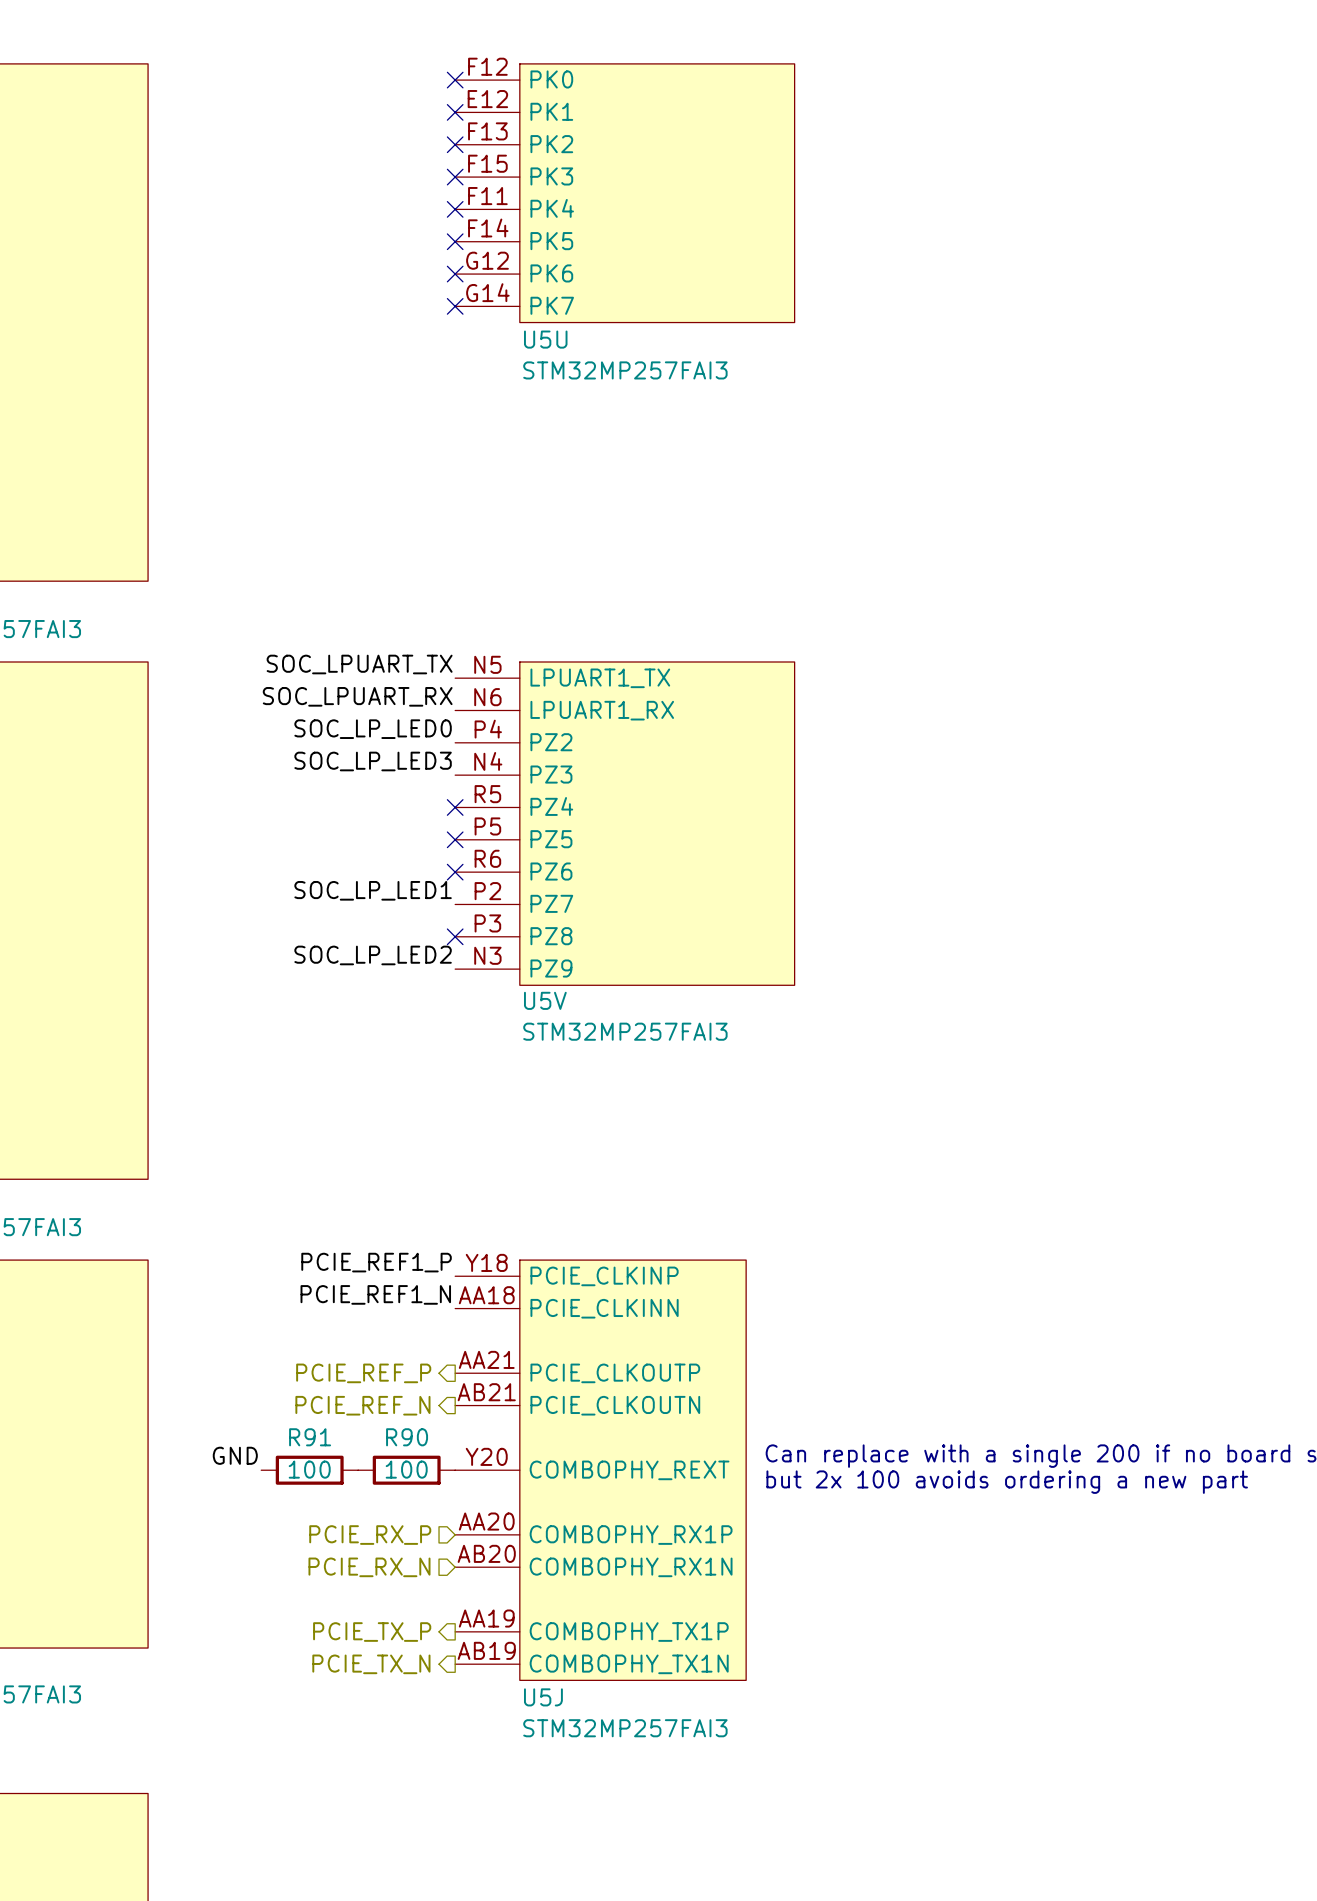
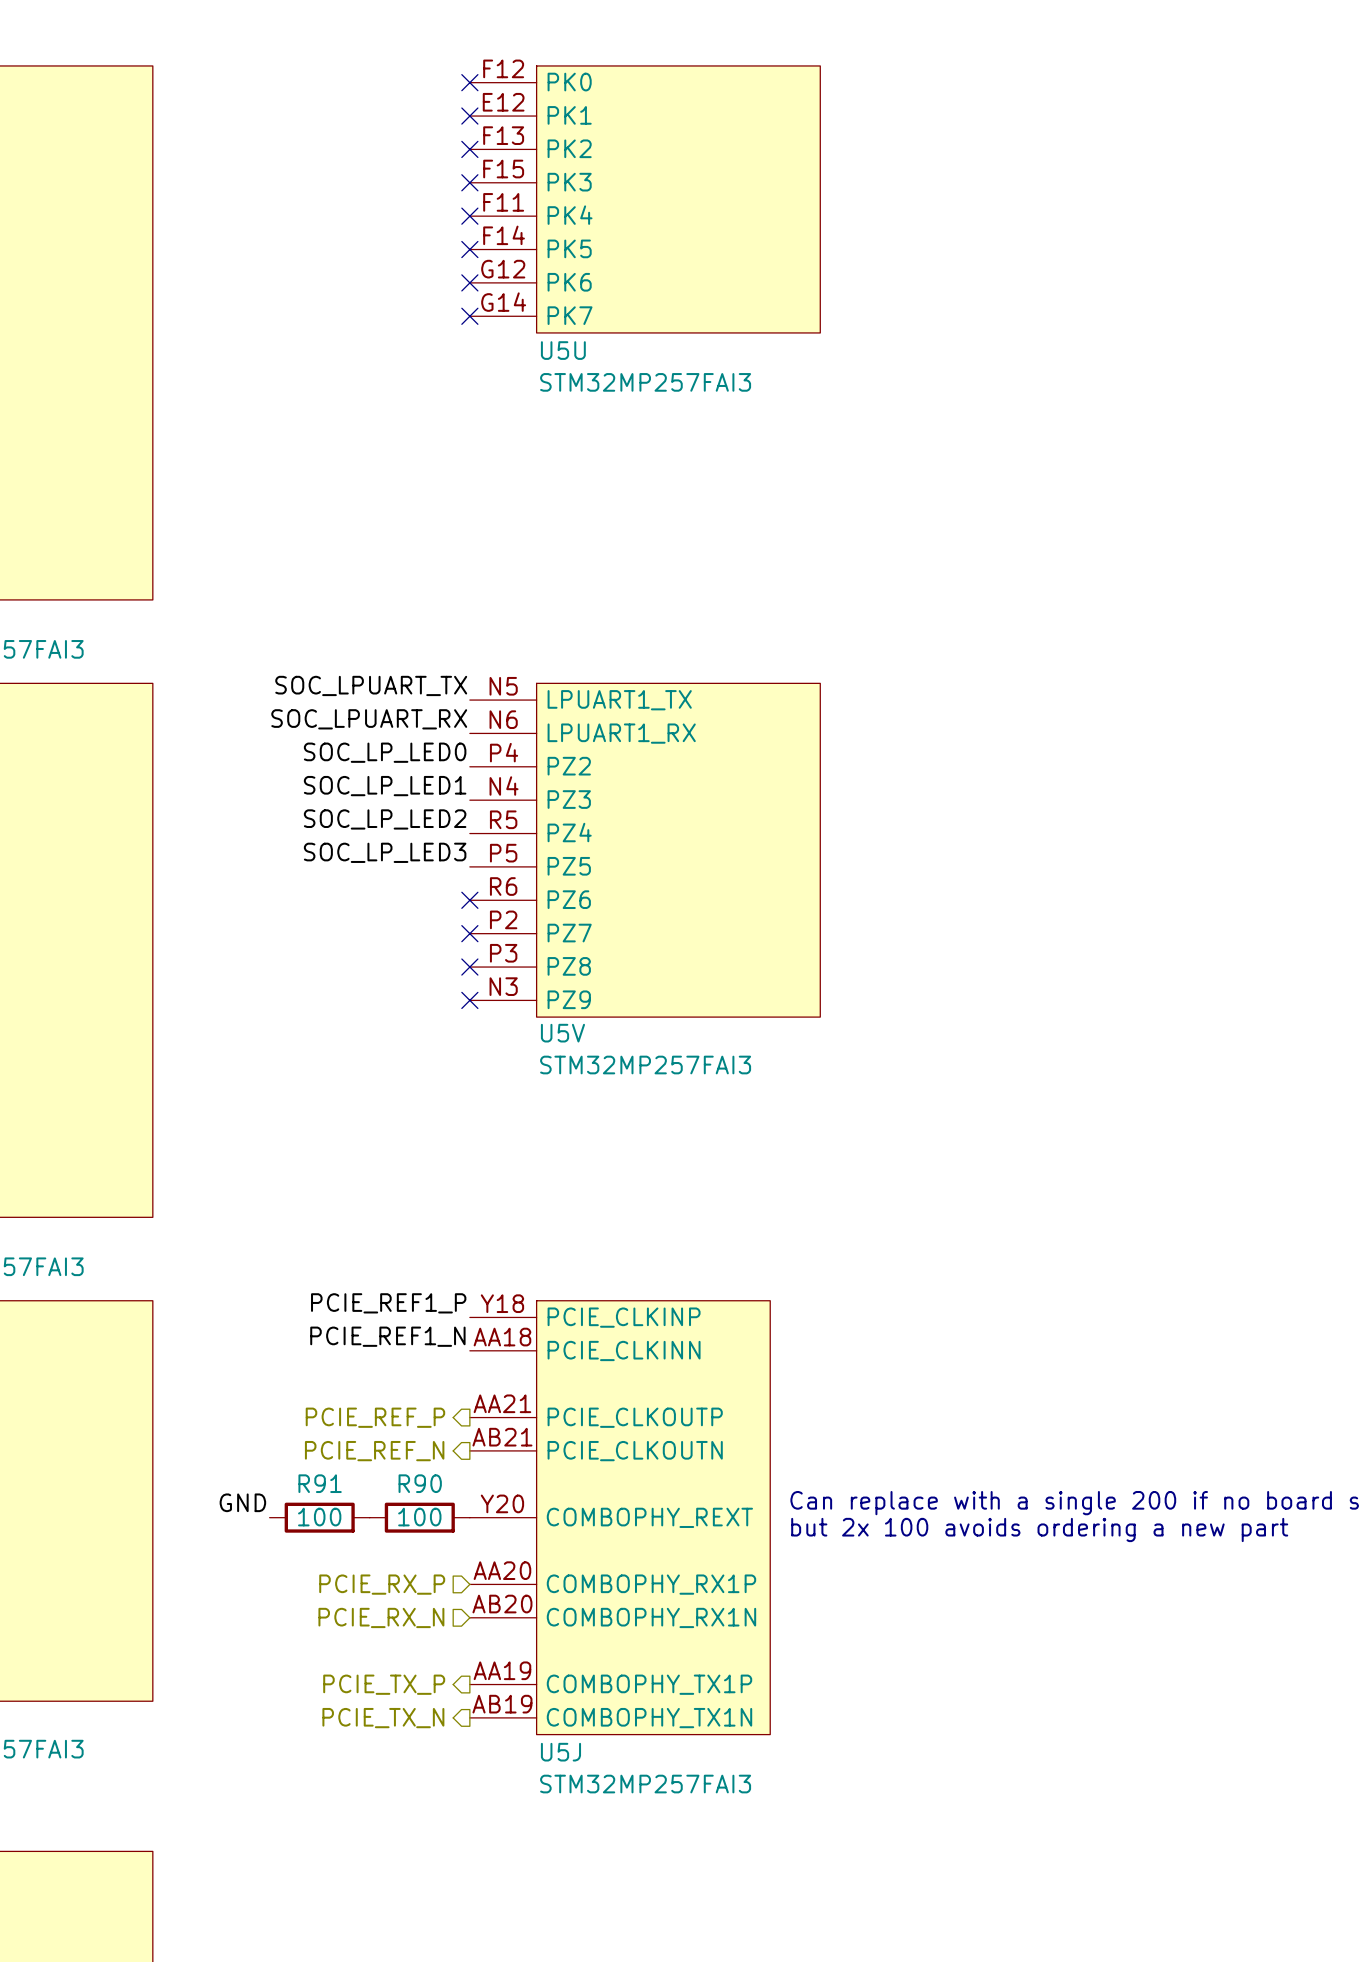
label: SOC_LP_LED3 (373, 761) -> SOC_LP_LED1 (385, 786)
no-connect mark: (455, 807) -> none
label: none -> SOC_LP_LED3 (385, 852)
no-connect mark: (455, 839) -> none
label: SOC_LP_LED1 (373, 890) -> none
no-connect mark: none -> (469, 933)
label position: SOC_LP_LED2 (373, 955) -> SOC_LP_LED2 (385, 819)
no-connect mark: none -> (469, 1000)

